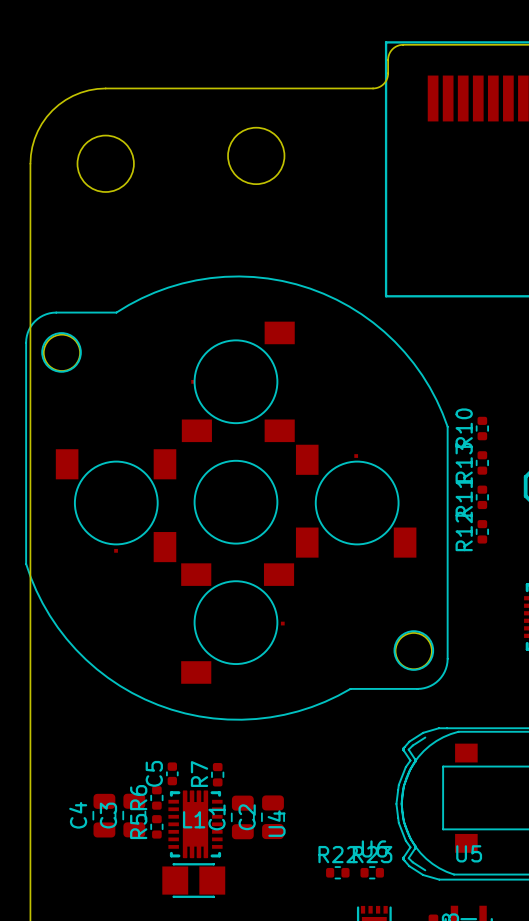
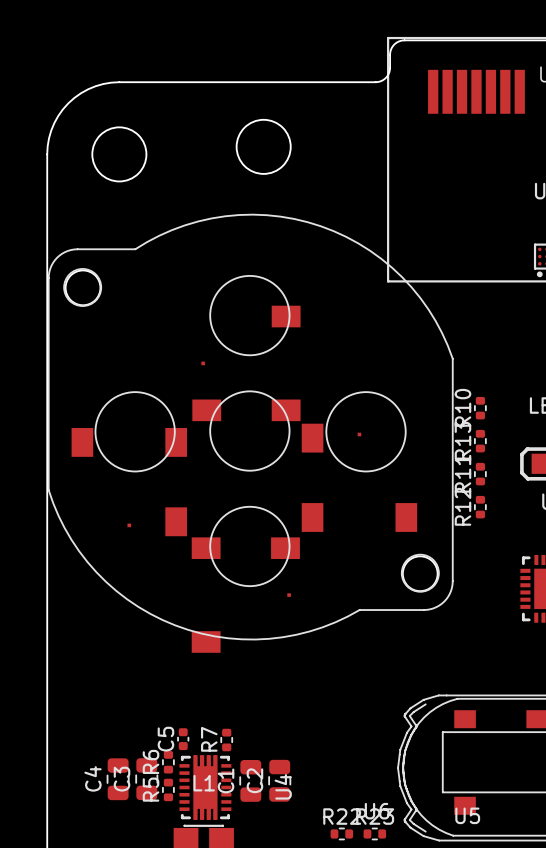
part position: (236, 498) -> (250, 427)

